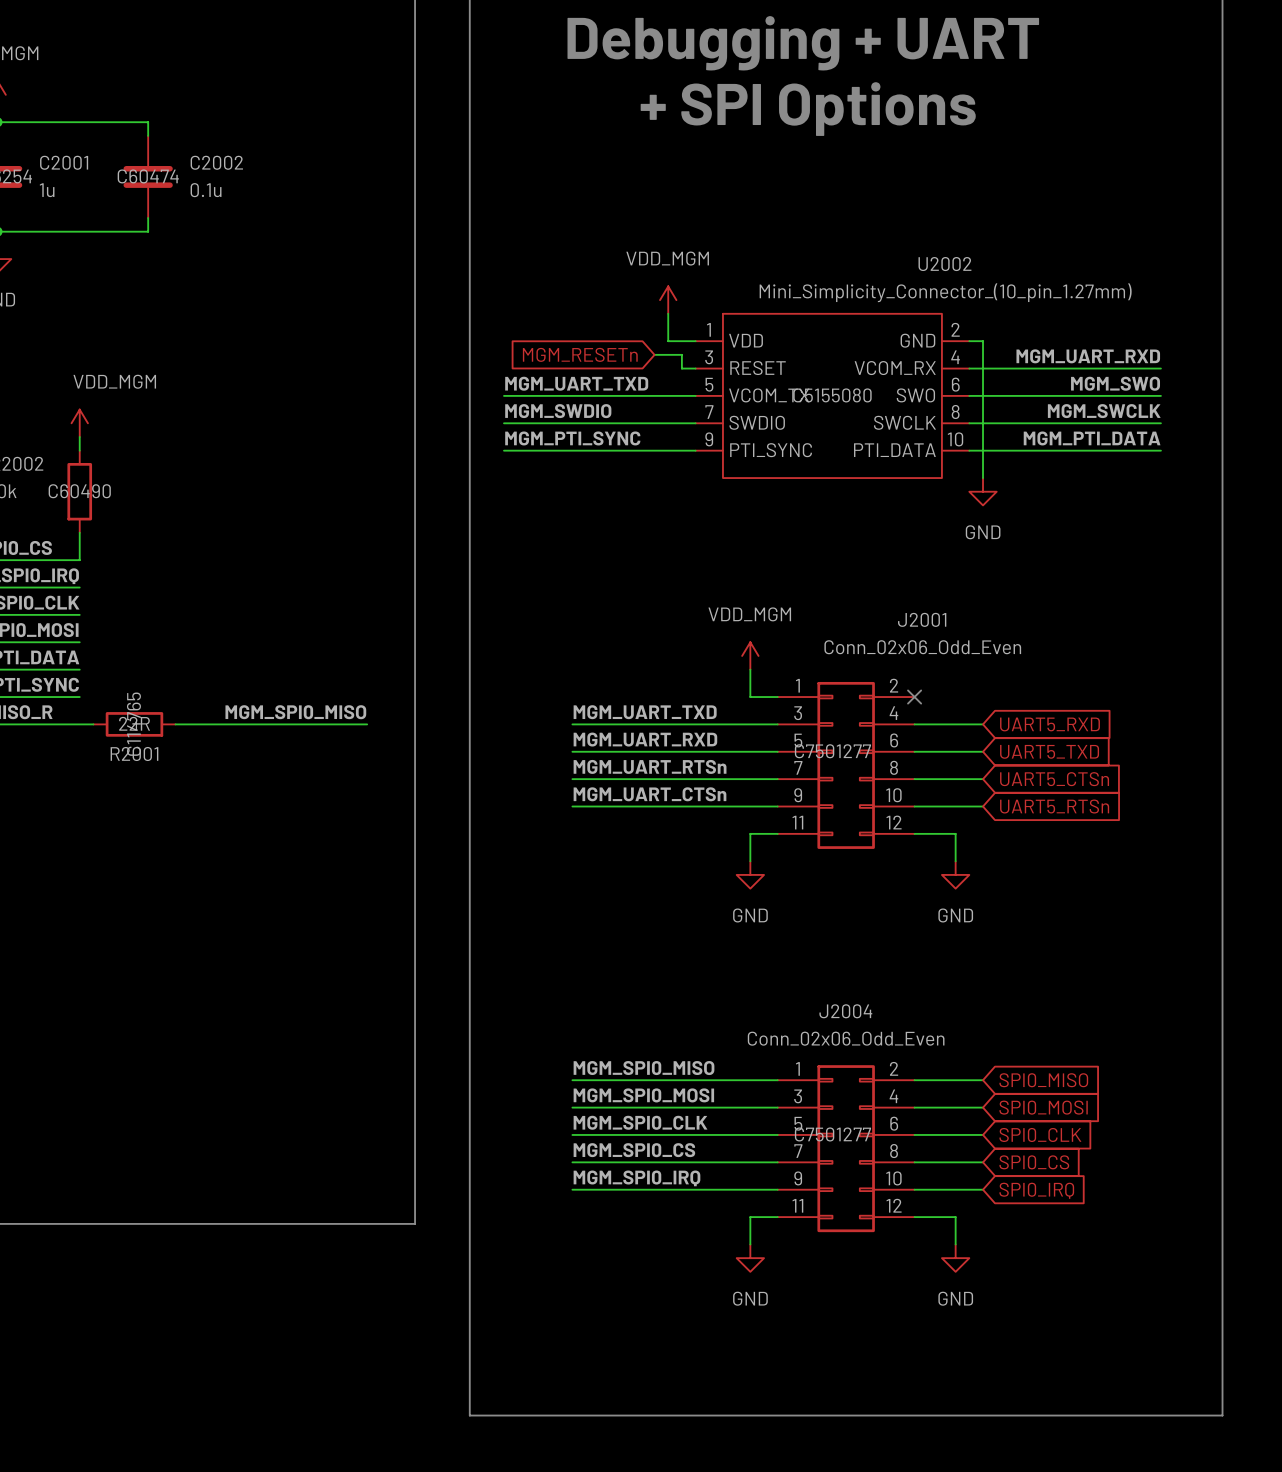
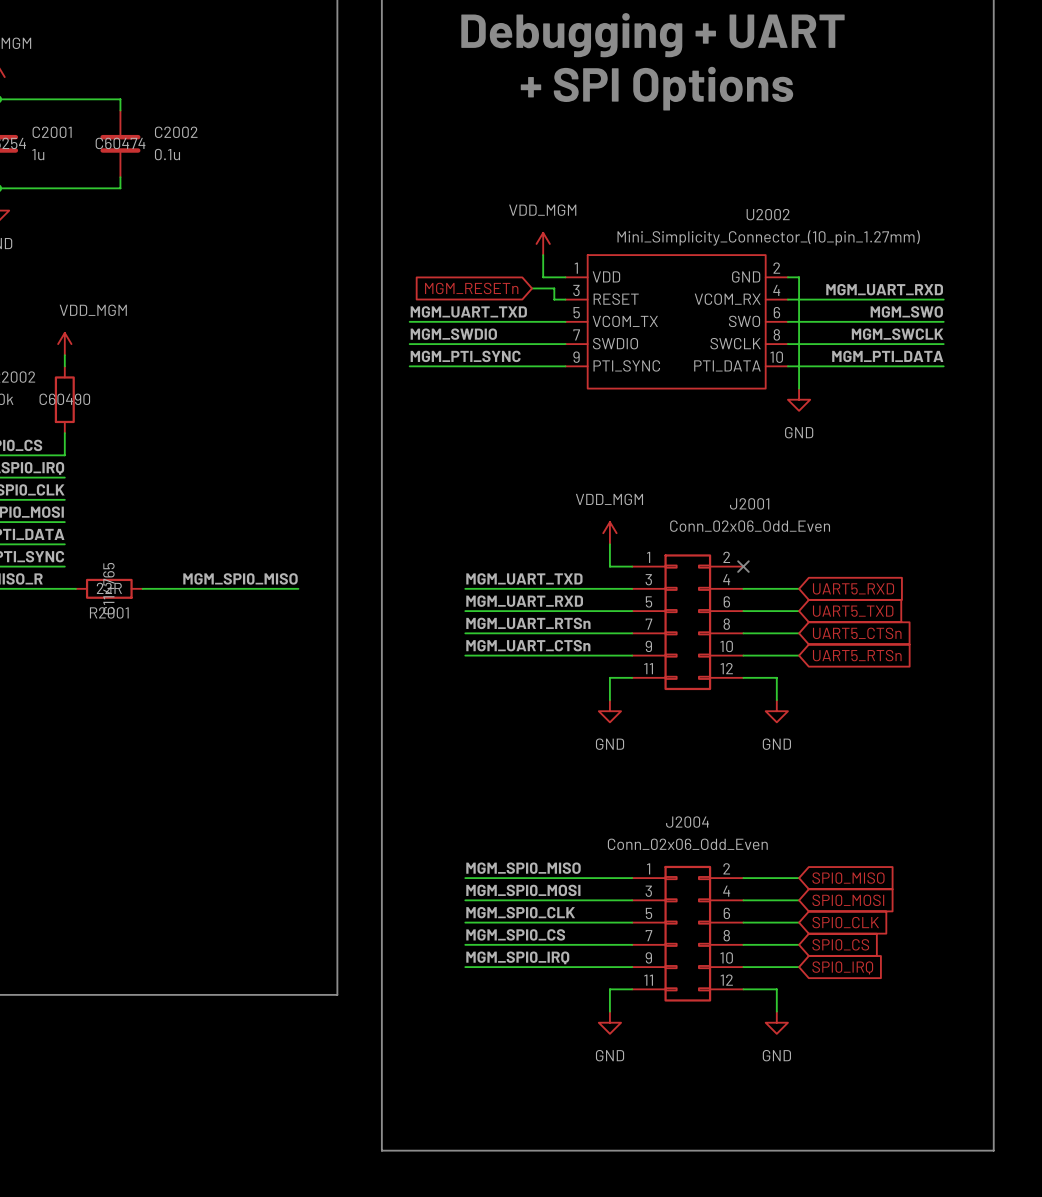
U2002 text: C5155080 (832, 395) -> none
J2001 text: C7501277 (832, 751) -> none
J2004 text: C7501277 (832, 1134) -> none

